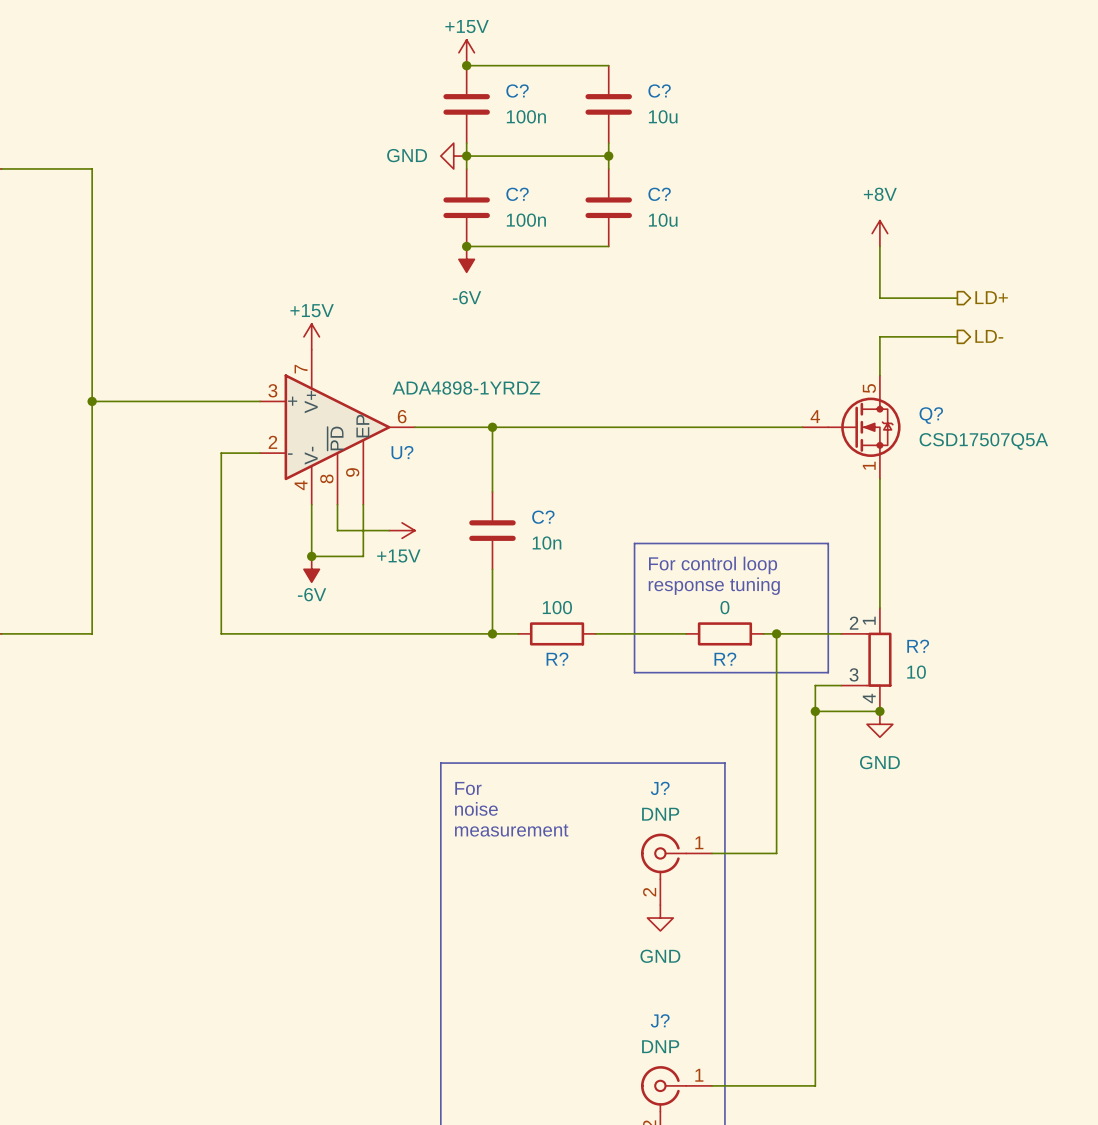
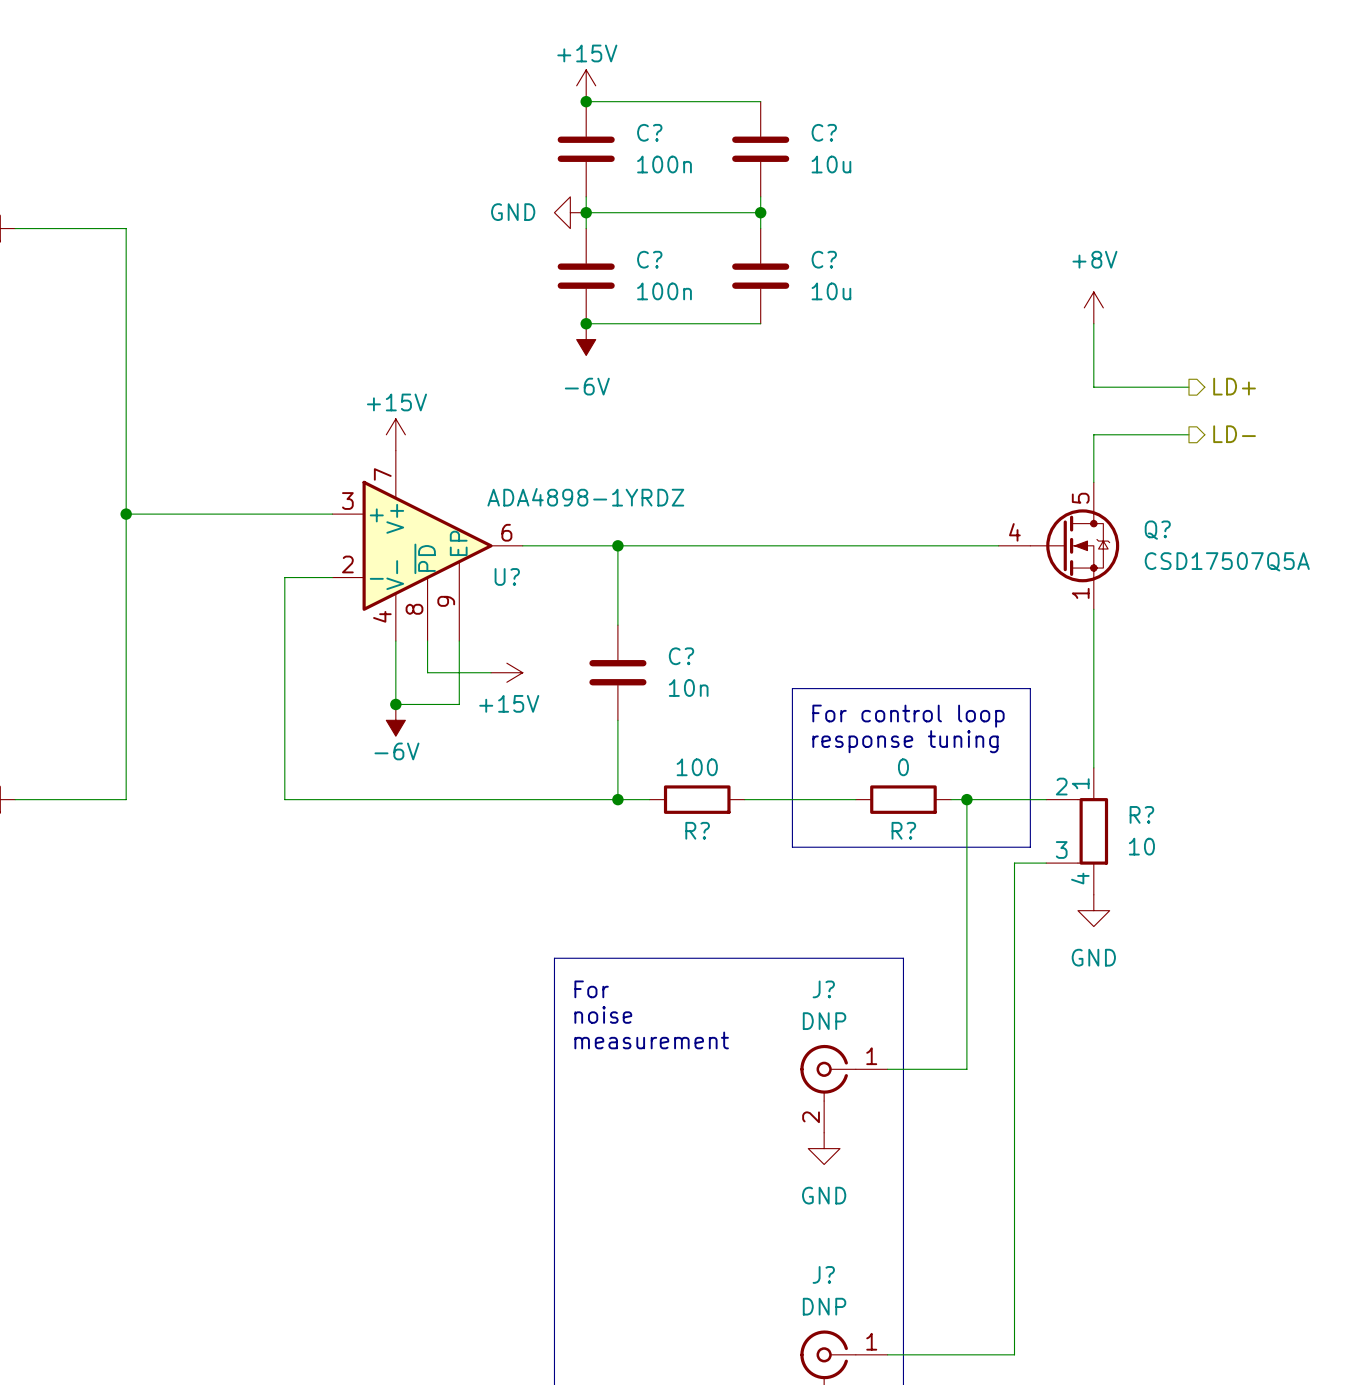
wire: (815, 711) (879, 711) -> none
junction: (815, 711) -> none
junction: (879, 711) -> none

